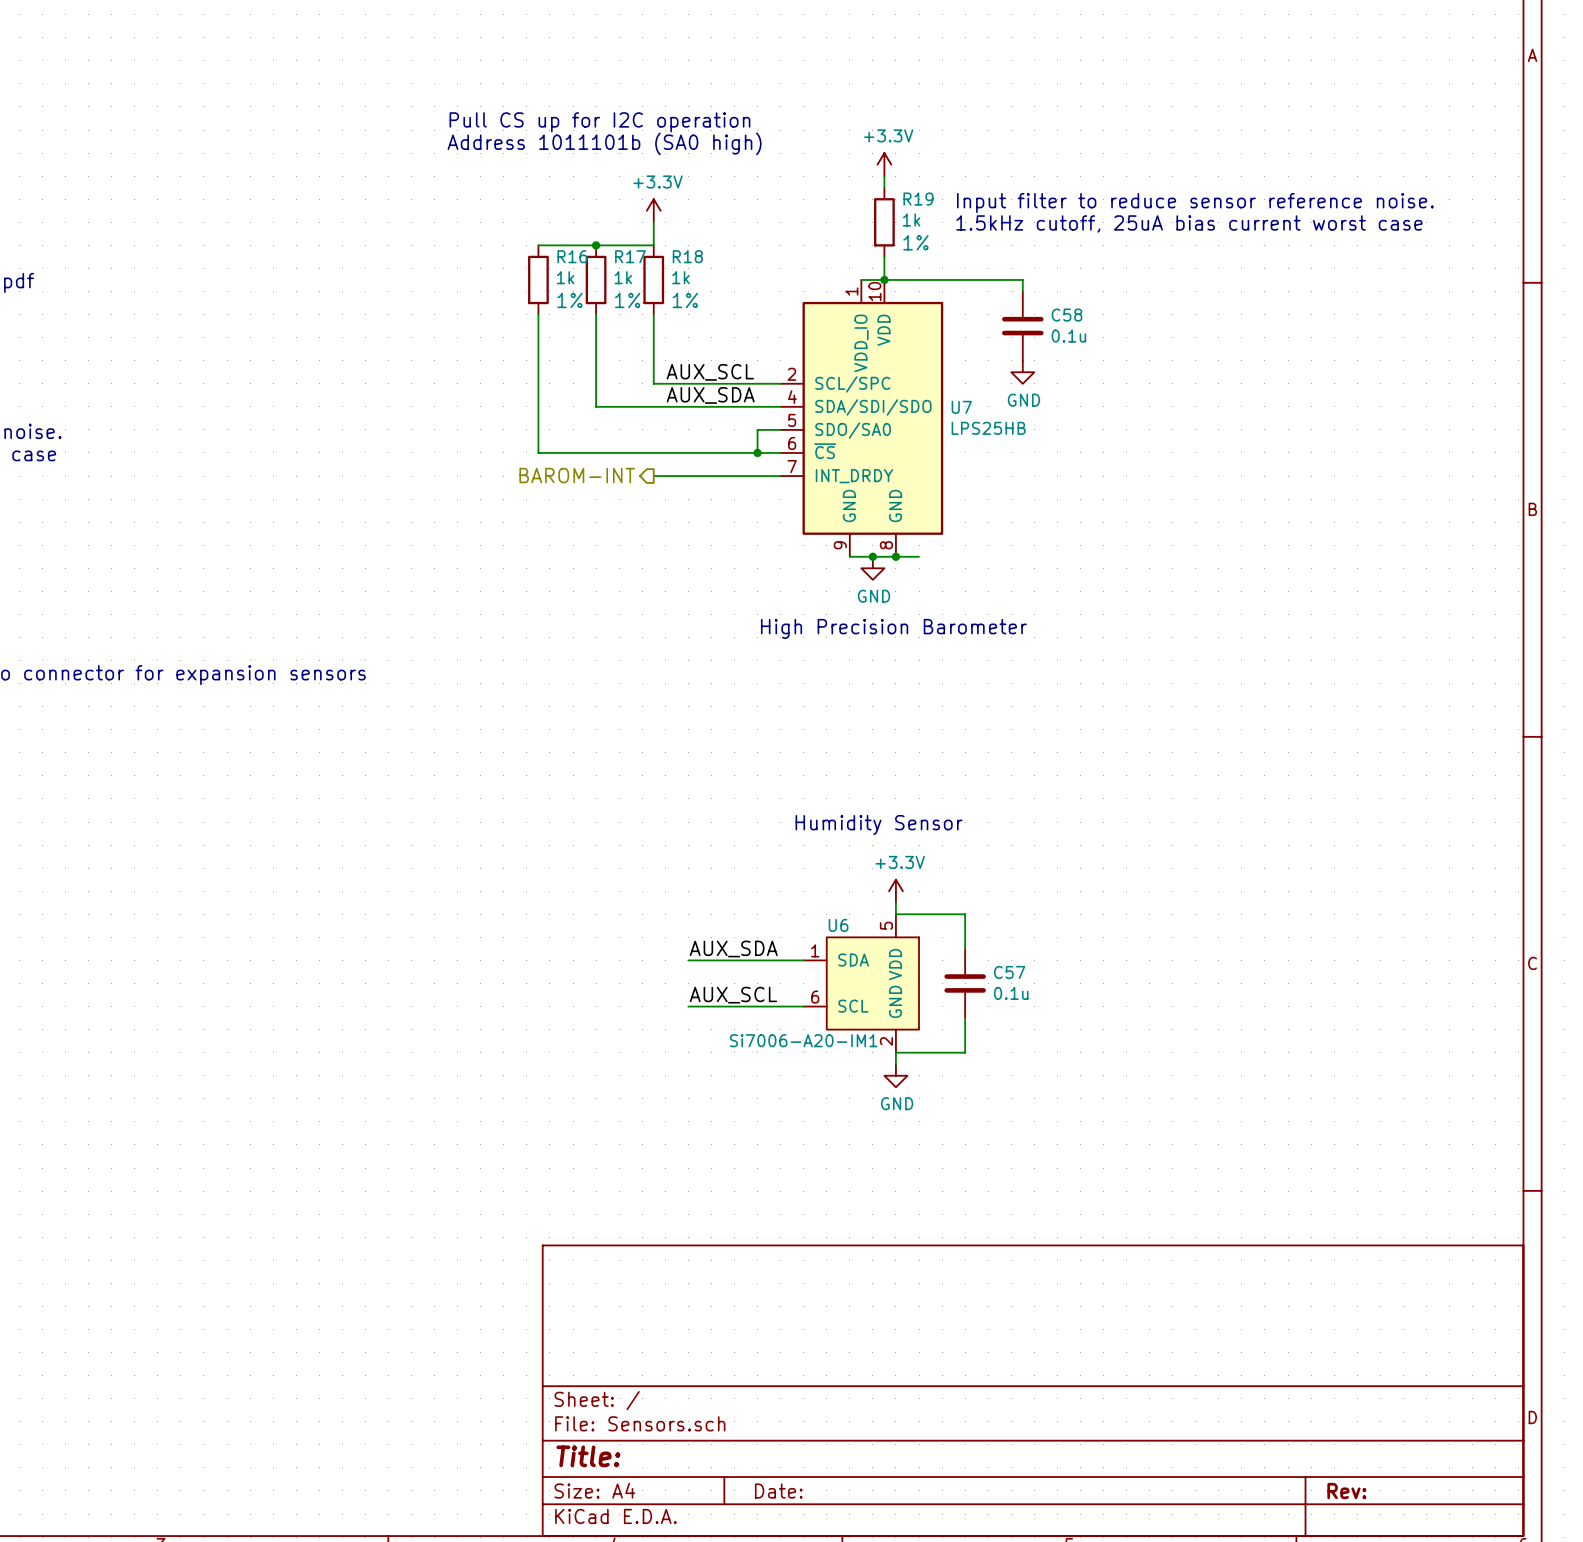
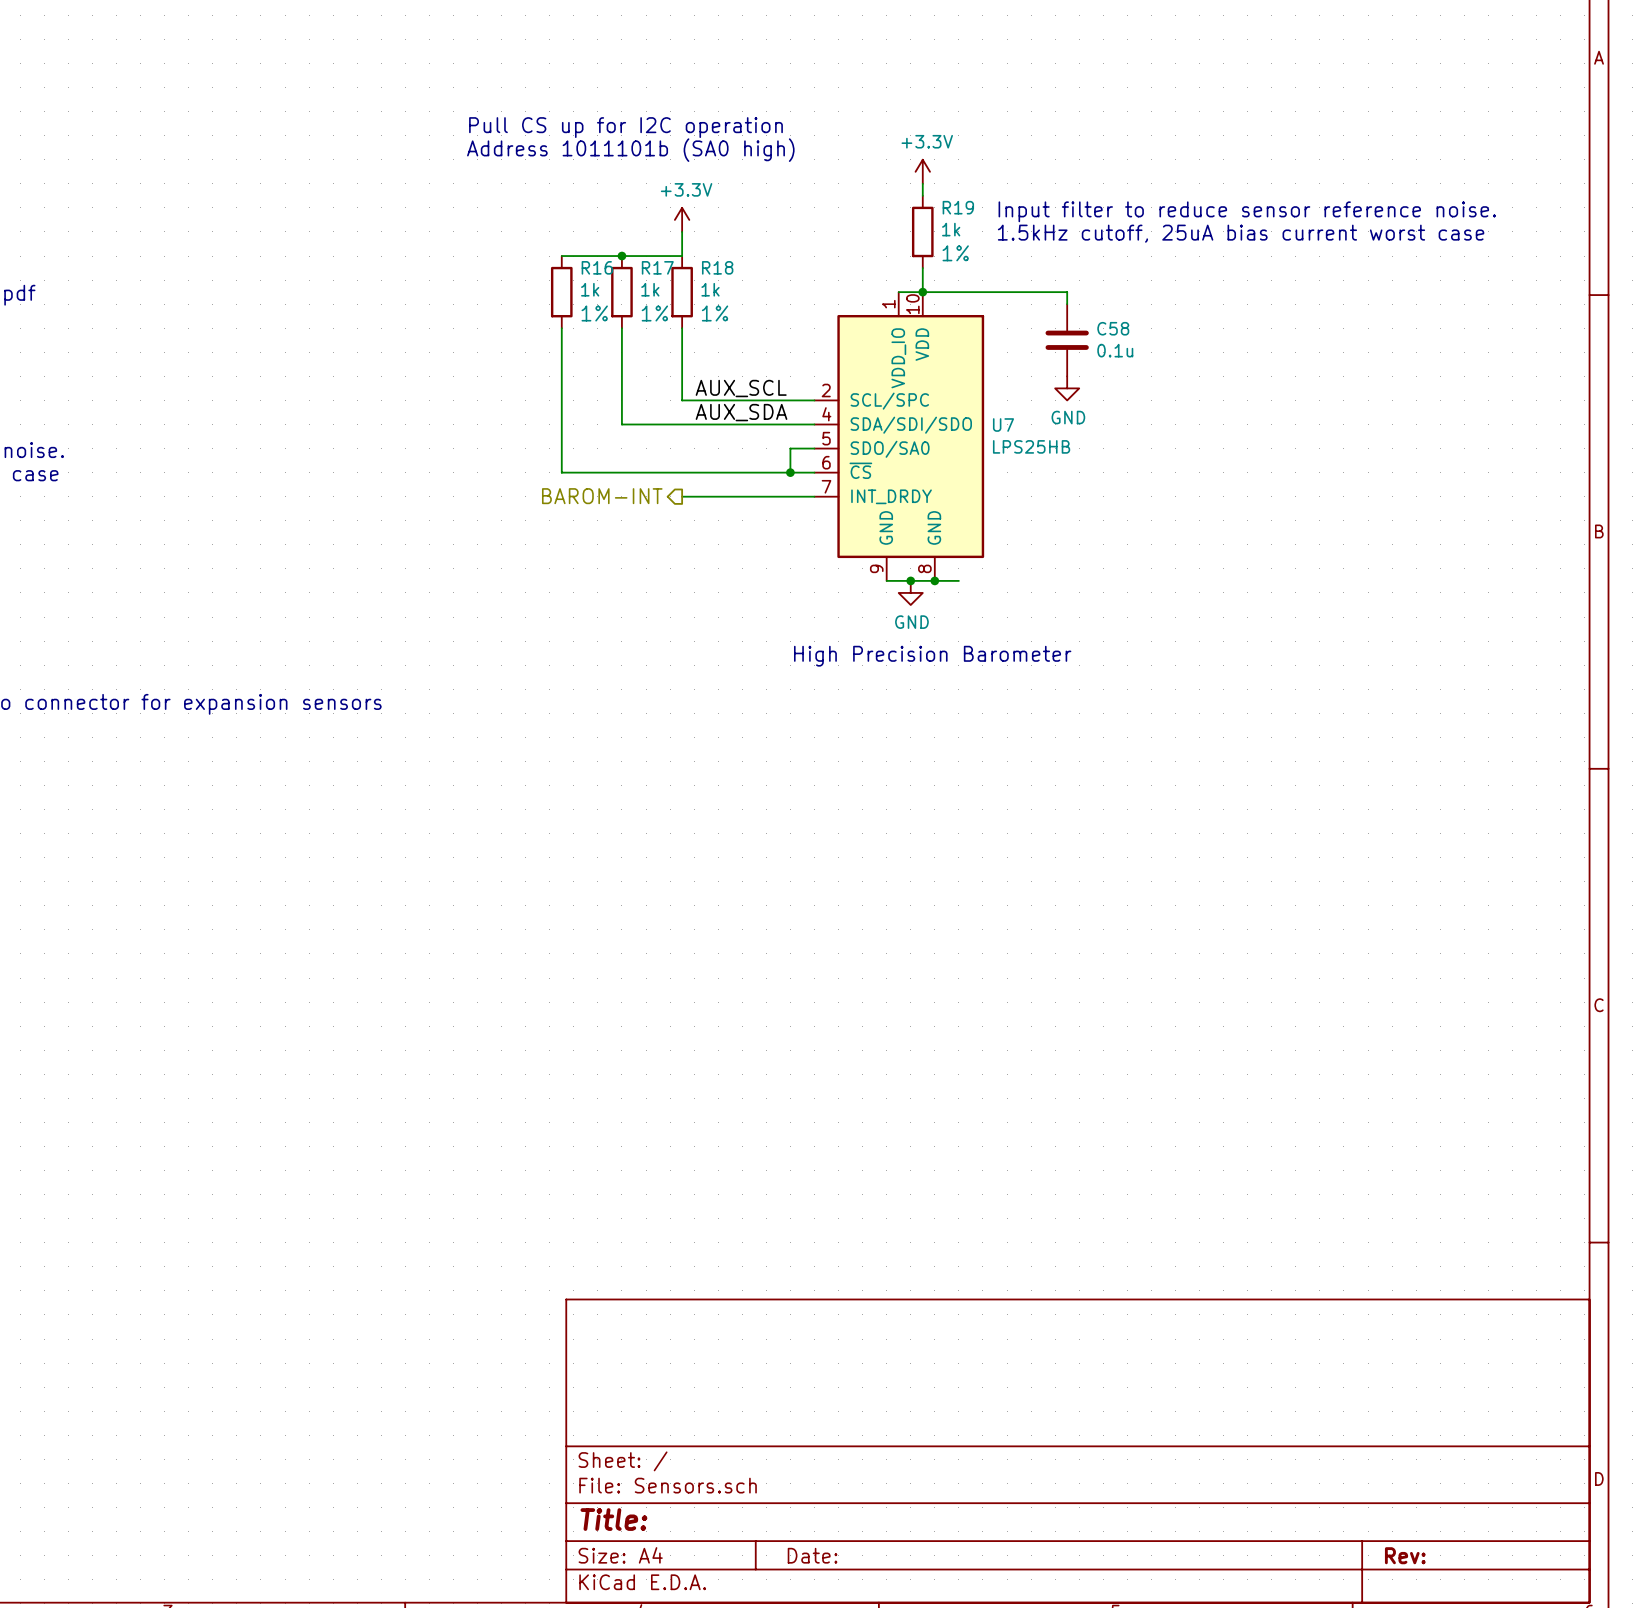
text: Humidity Sensor (879, 824) -> none
power symbol: +3.3V (895, 891) -> none
wire: (895, 902) (895, 914) (965, 914) (965, 948) -> none
label: AUX_SDA (733, 949) -> none
wire: (688, 960) (803, 960) -> none
U6: Si7006-A20-IM1 (861, 983) -> none
C57: 0.1u (965, 983) -> none
label: AUX_SCL (733, 995) -> none
wire: (688, 1006) (803, 1006) -> none
wire: (965, 1018) (965, 1052) (895, 1052) (895, 1064) -> none
power symbol: GND (895, 1075) -> none

